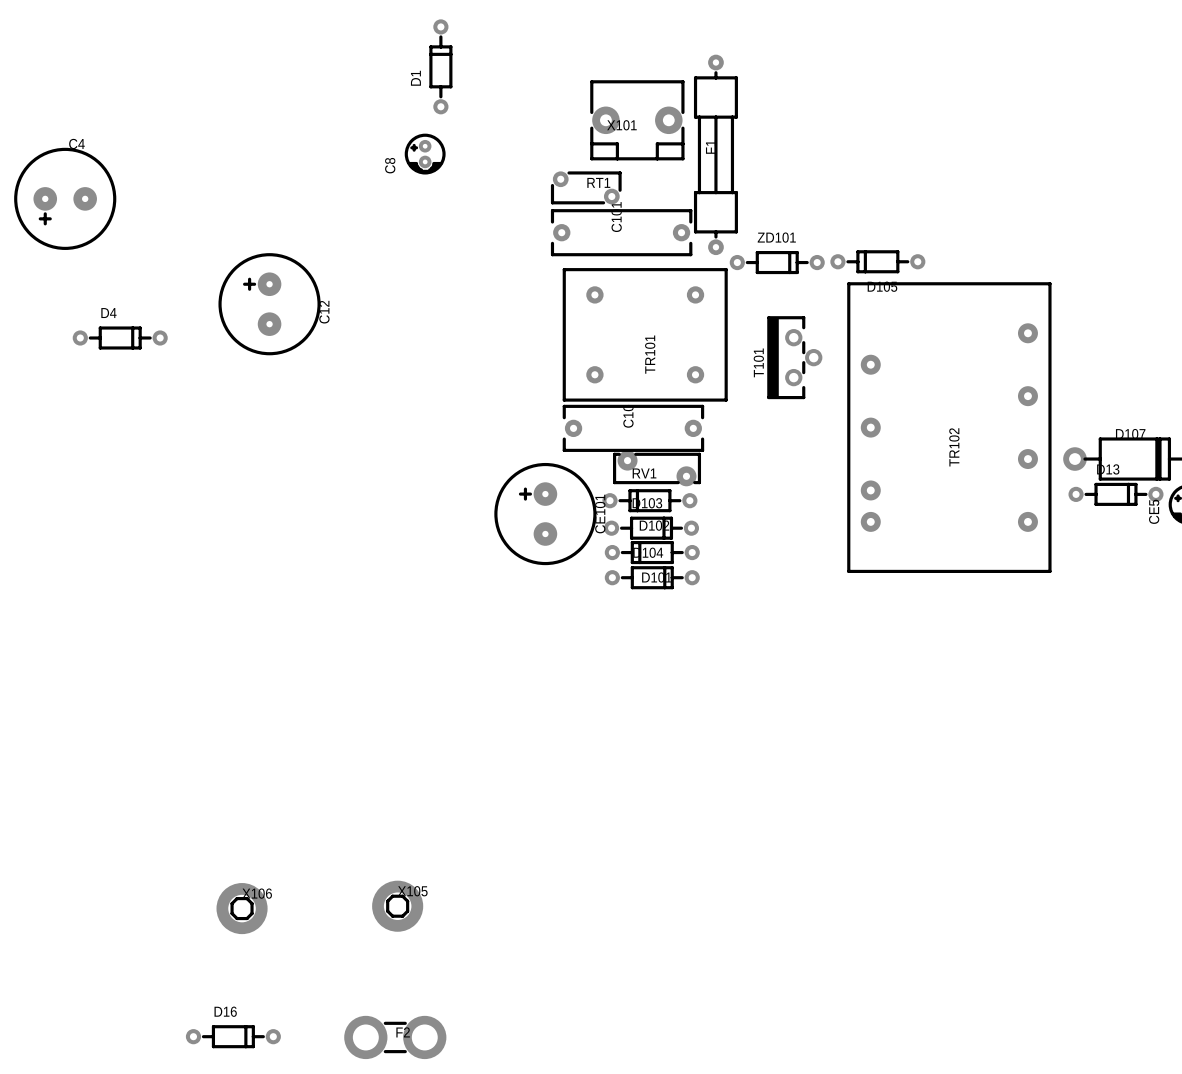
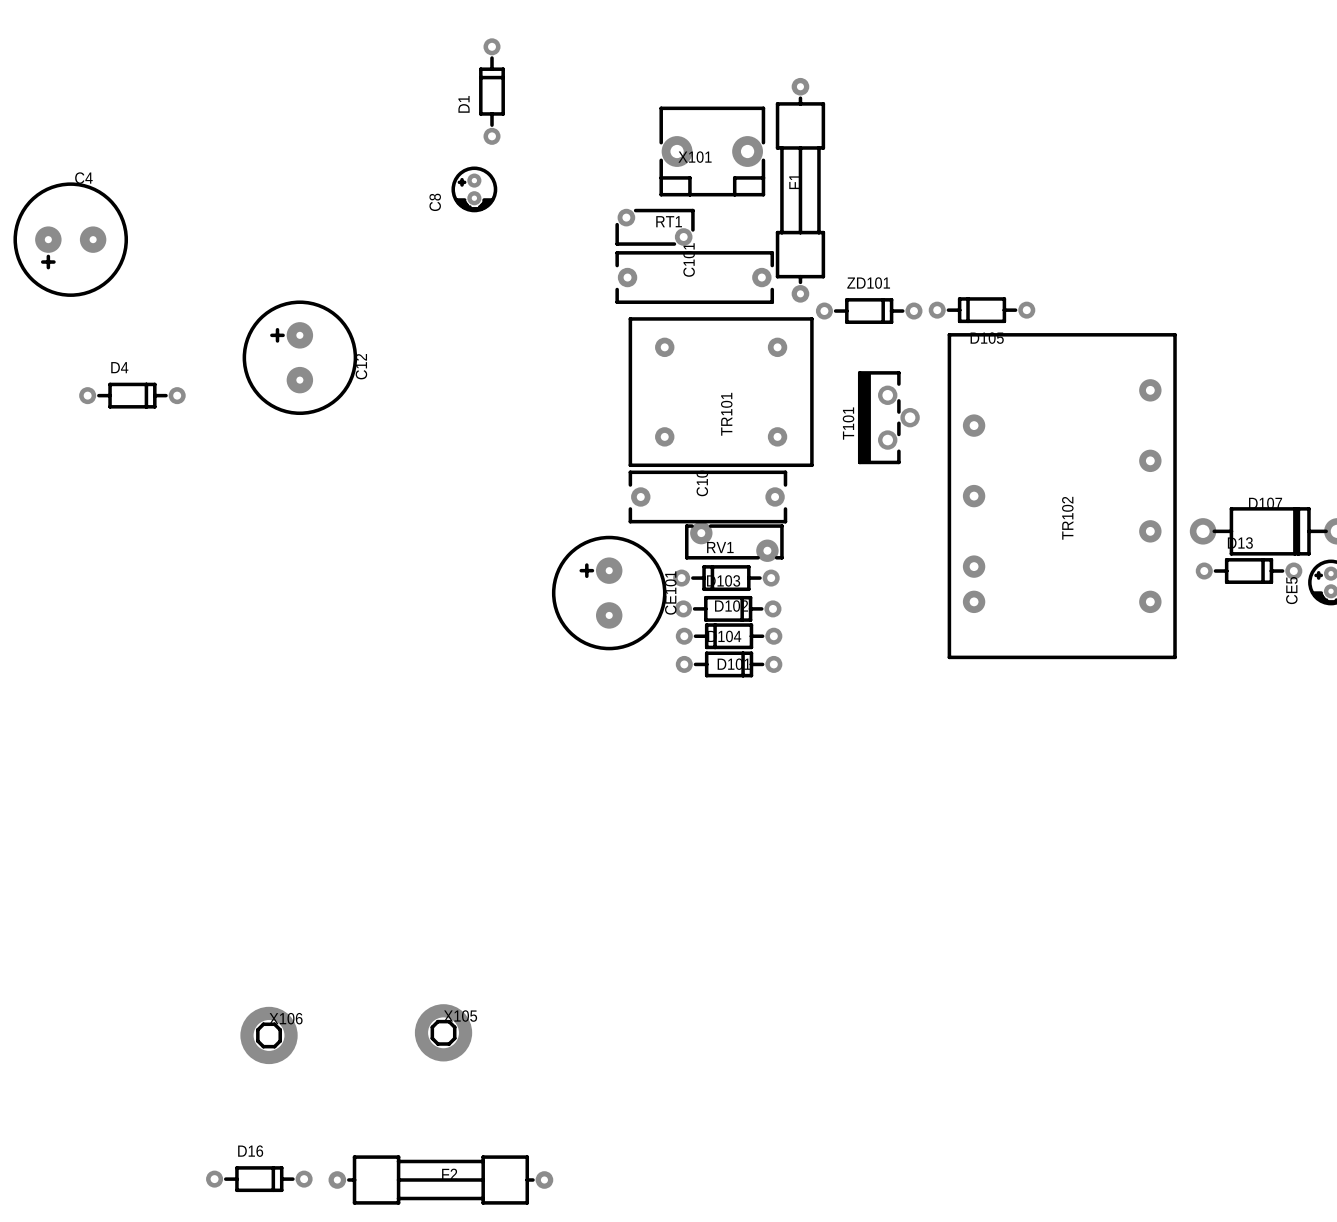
F2 footprint: [344, 1015, 447, 1060] -> [328, 1155, 554, 1205]

